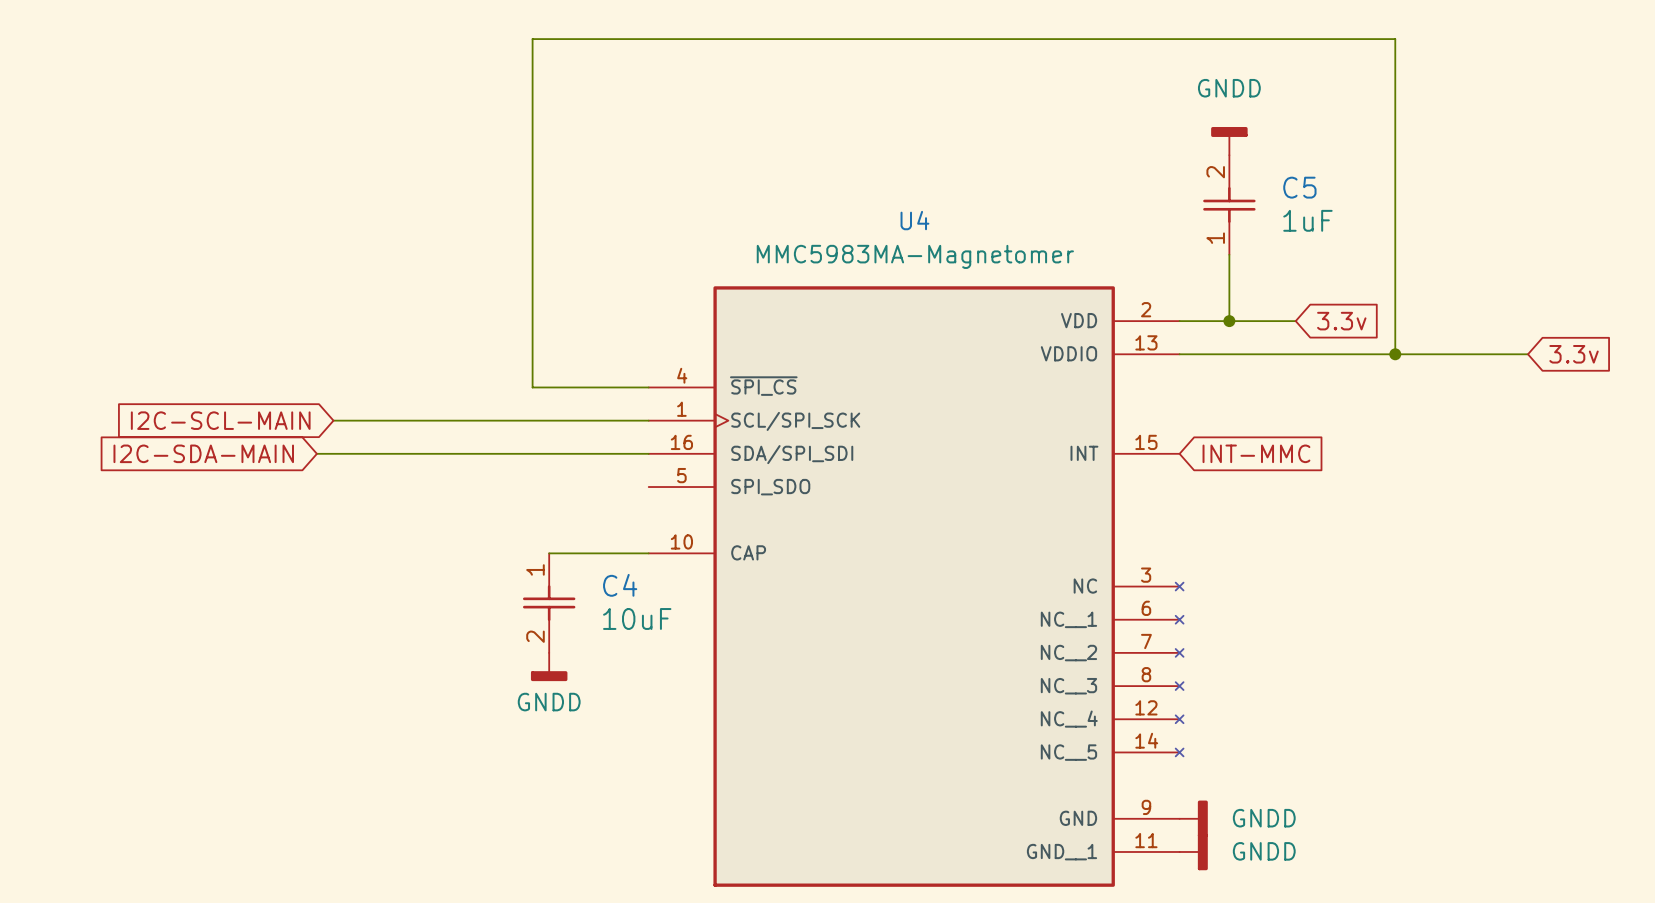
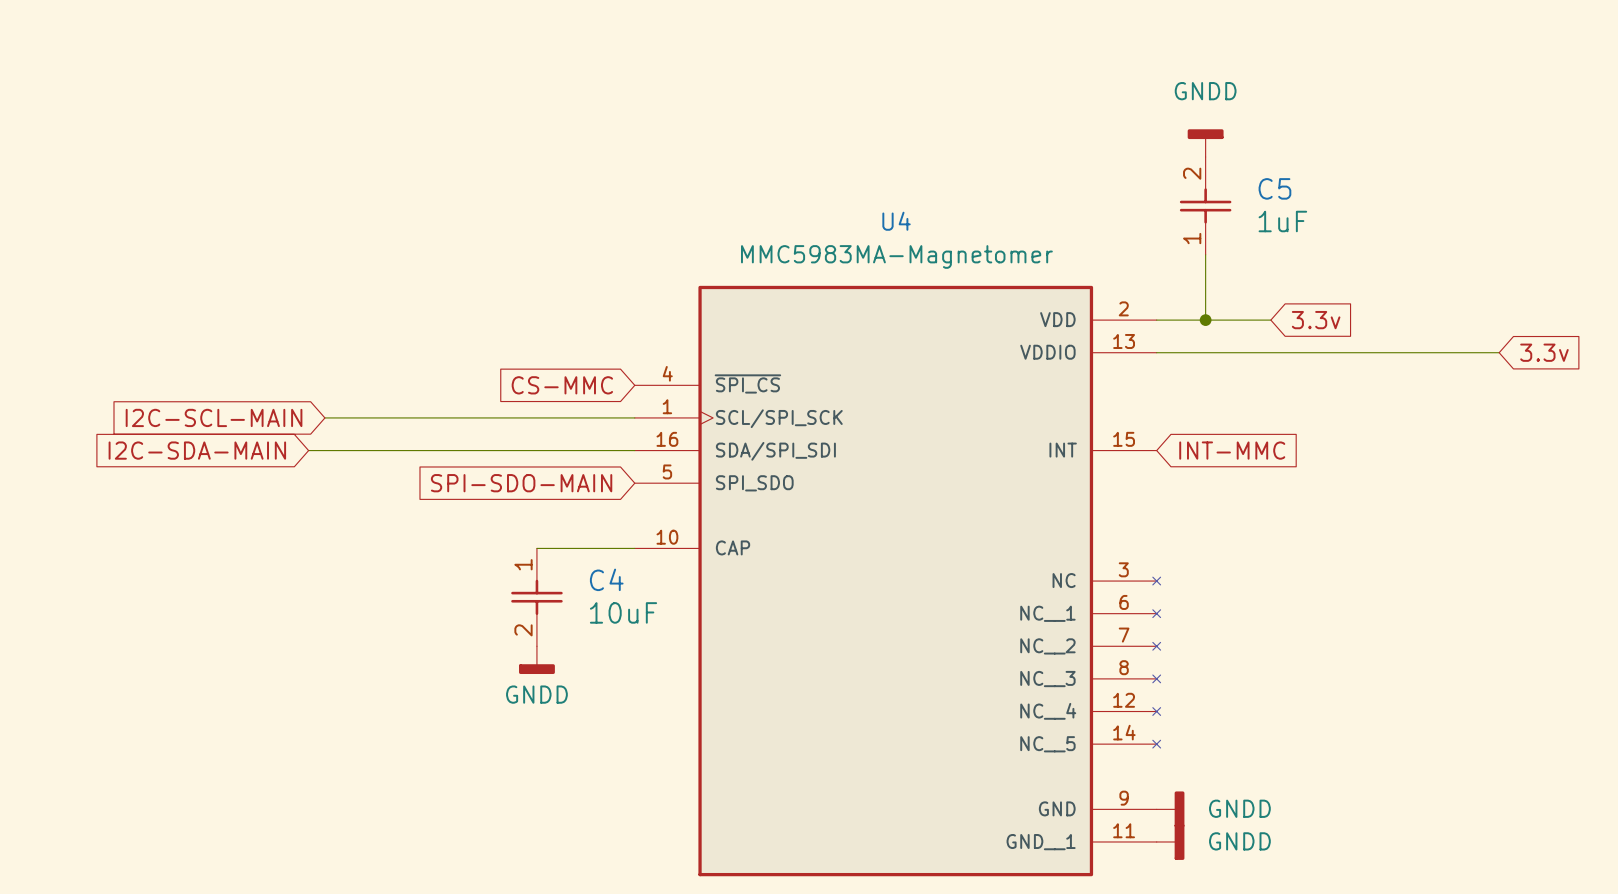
wire: (1395, 354) (1395, 39) (532, 39) (532, 387) (648, 387) -> none
junction: (1395, 354) -> none
global label: none -> CS-MMC (562, 385)
global label: none -> SPI-SDO-MAIN (521, 483)

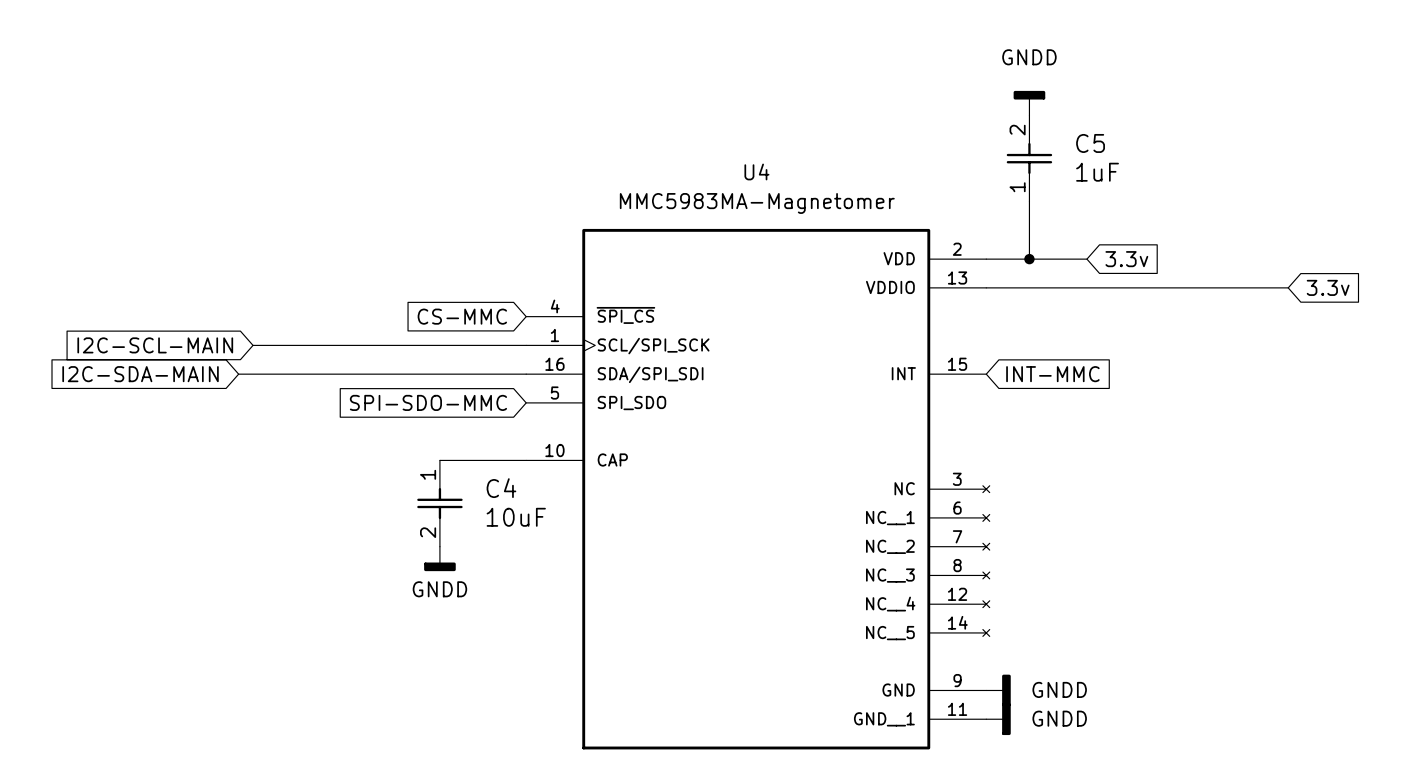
global label: SPI-SDO-MAIN (521, 483) -> SPI-SDO-MMC (428, 402)

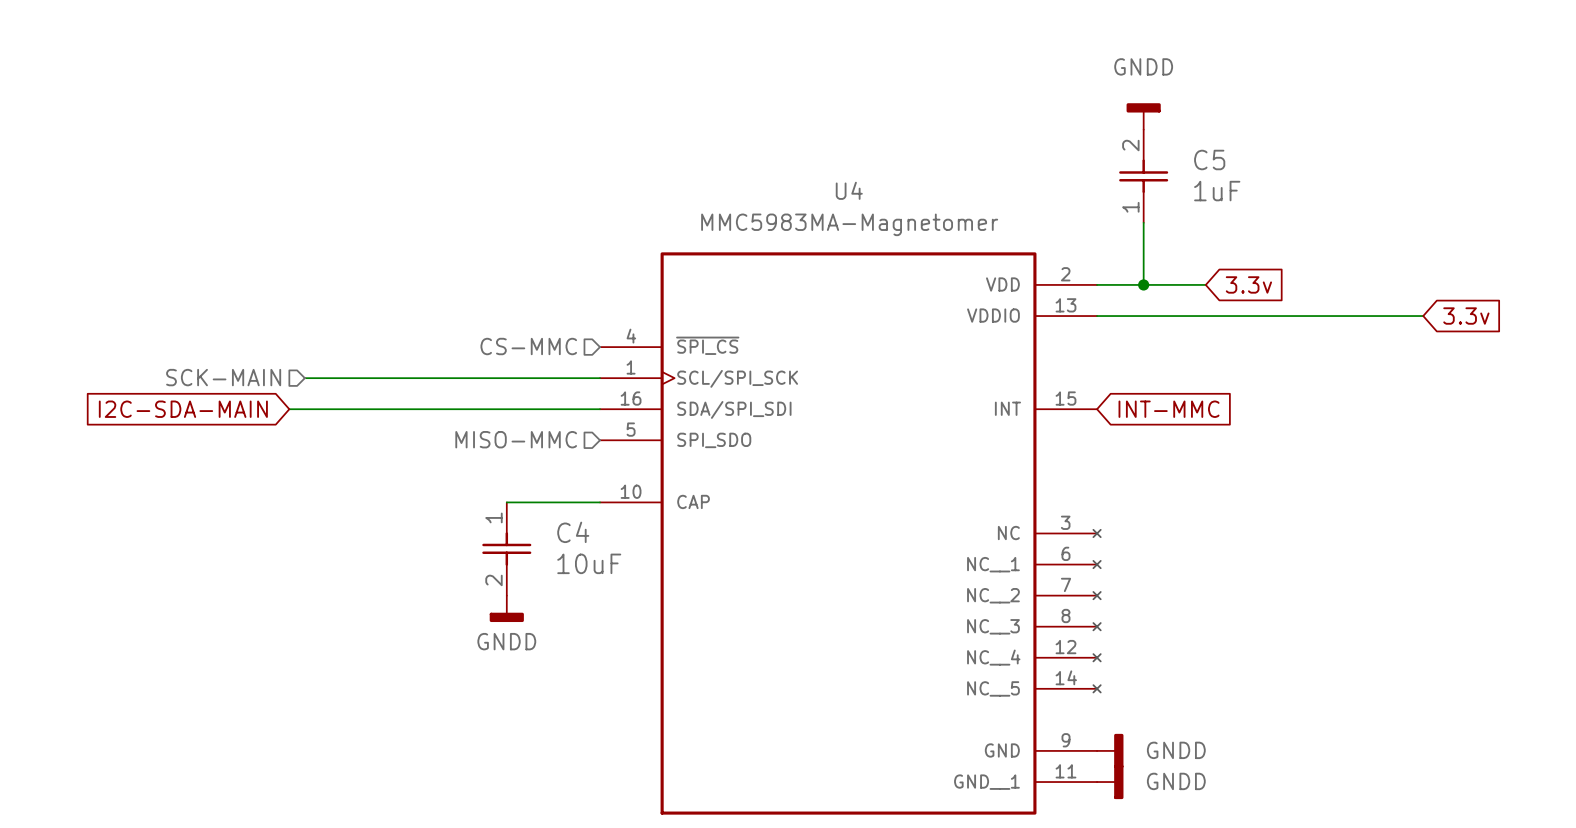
hierarchical label: none -> CS-MMC (528, 346)
global label: CS-MMC (462, 316) -> none
hierarchical label: none -> SCK-MAIN (223, 377)
global label: I2C-SCL-MAIN (155, 345) -> none
global label: SPI-SDO-MMC (428, 402) -> none
hierarchical label: none -> MISO-MMC (516, 439)

